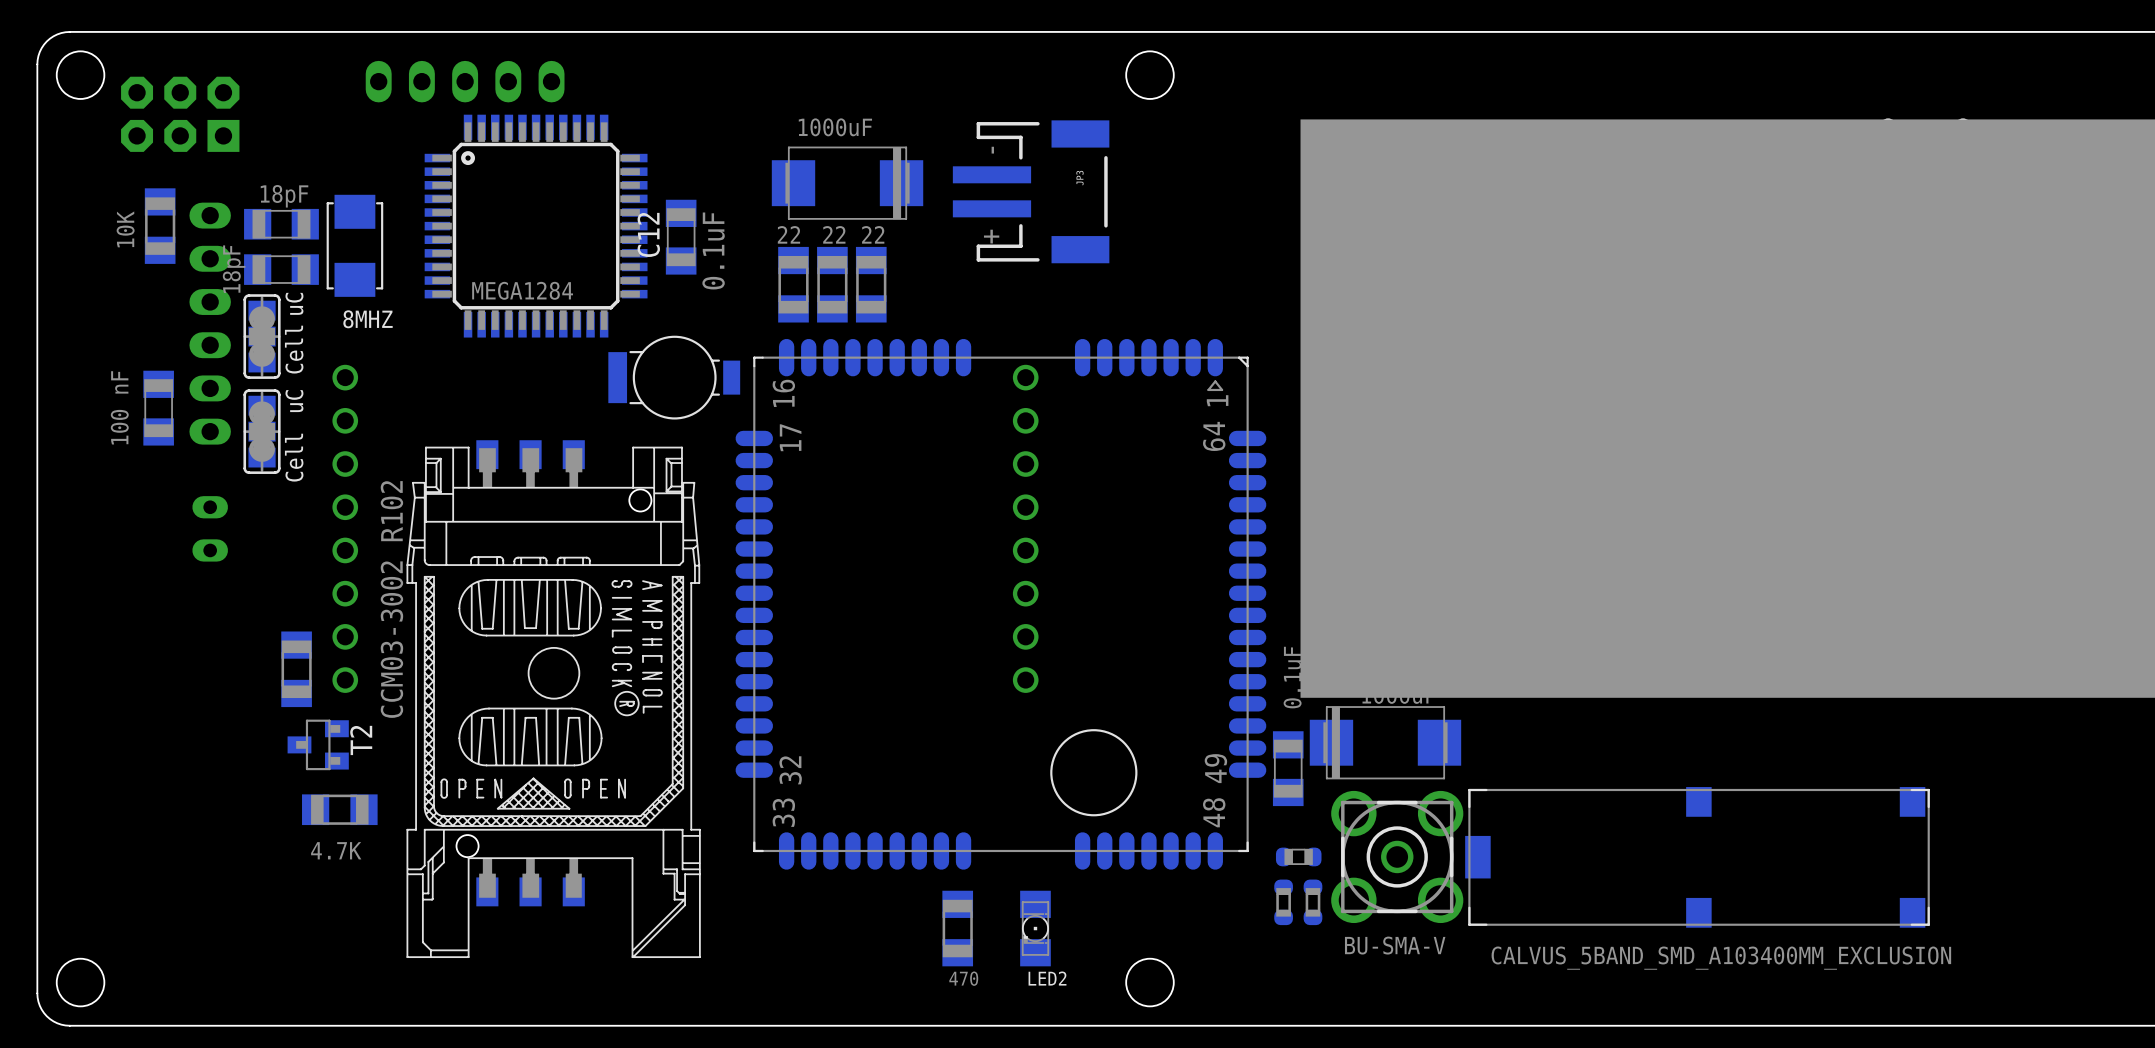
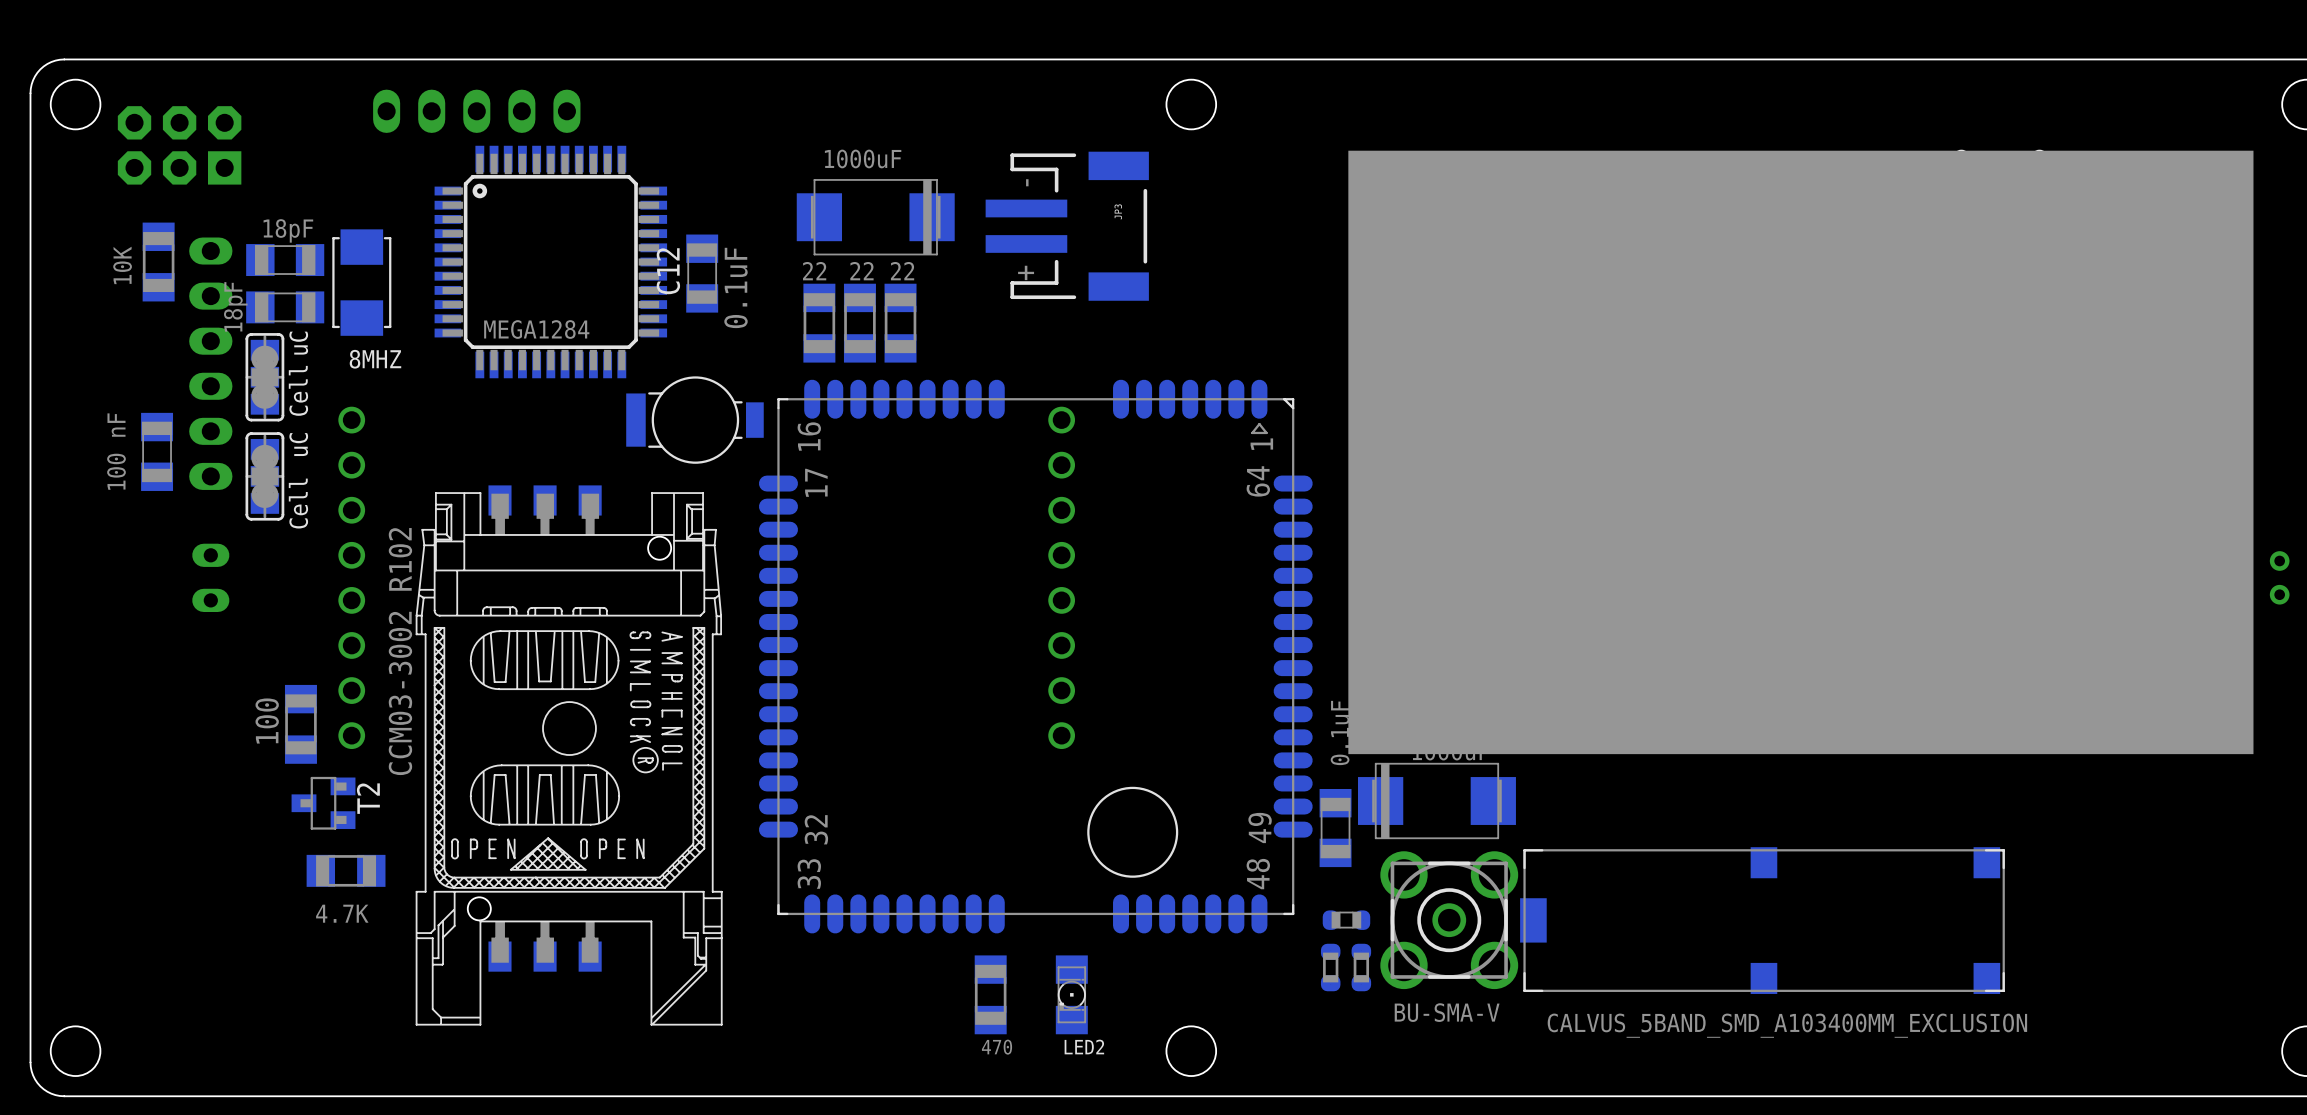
part value: none -> 100 (267, 721)

